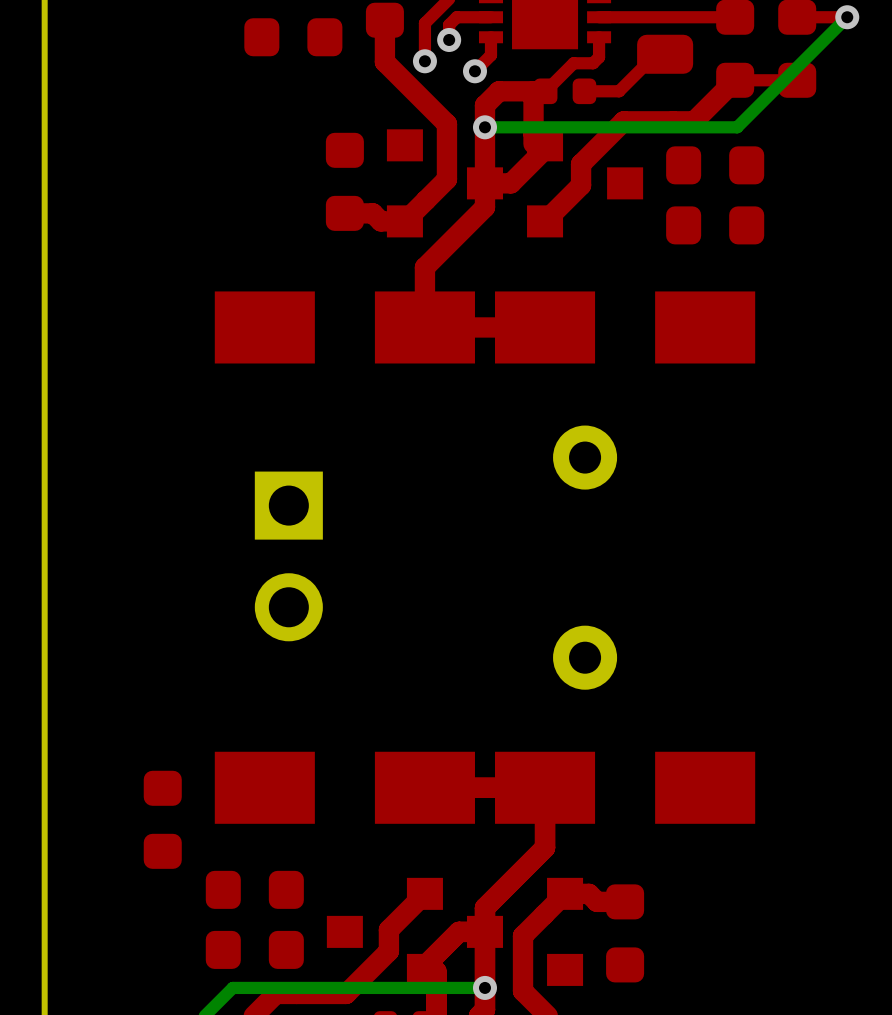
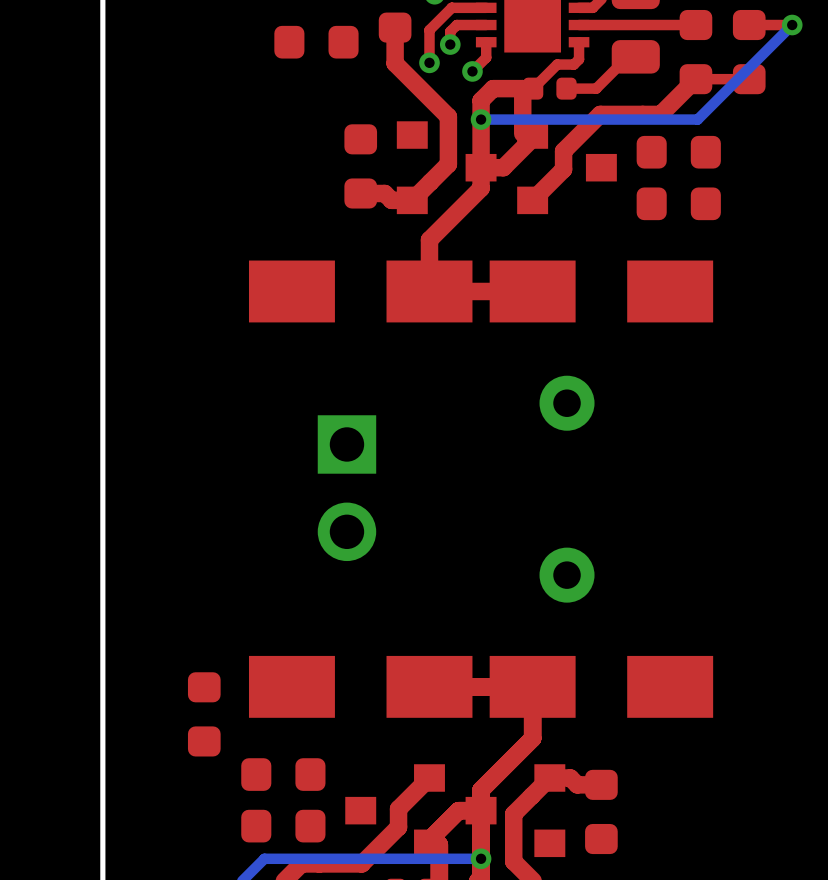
part position: (288, 556) -> (346, 488)

